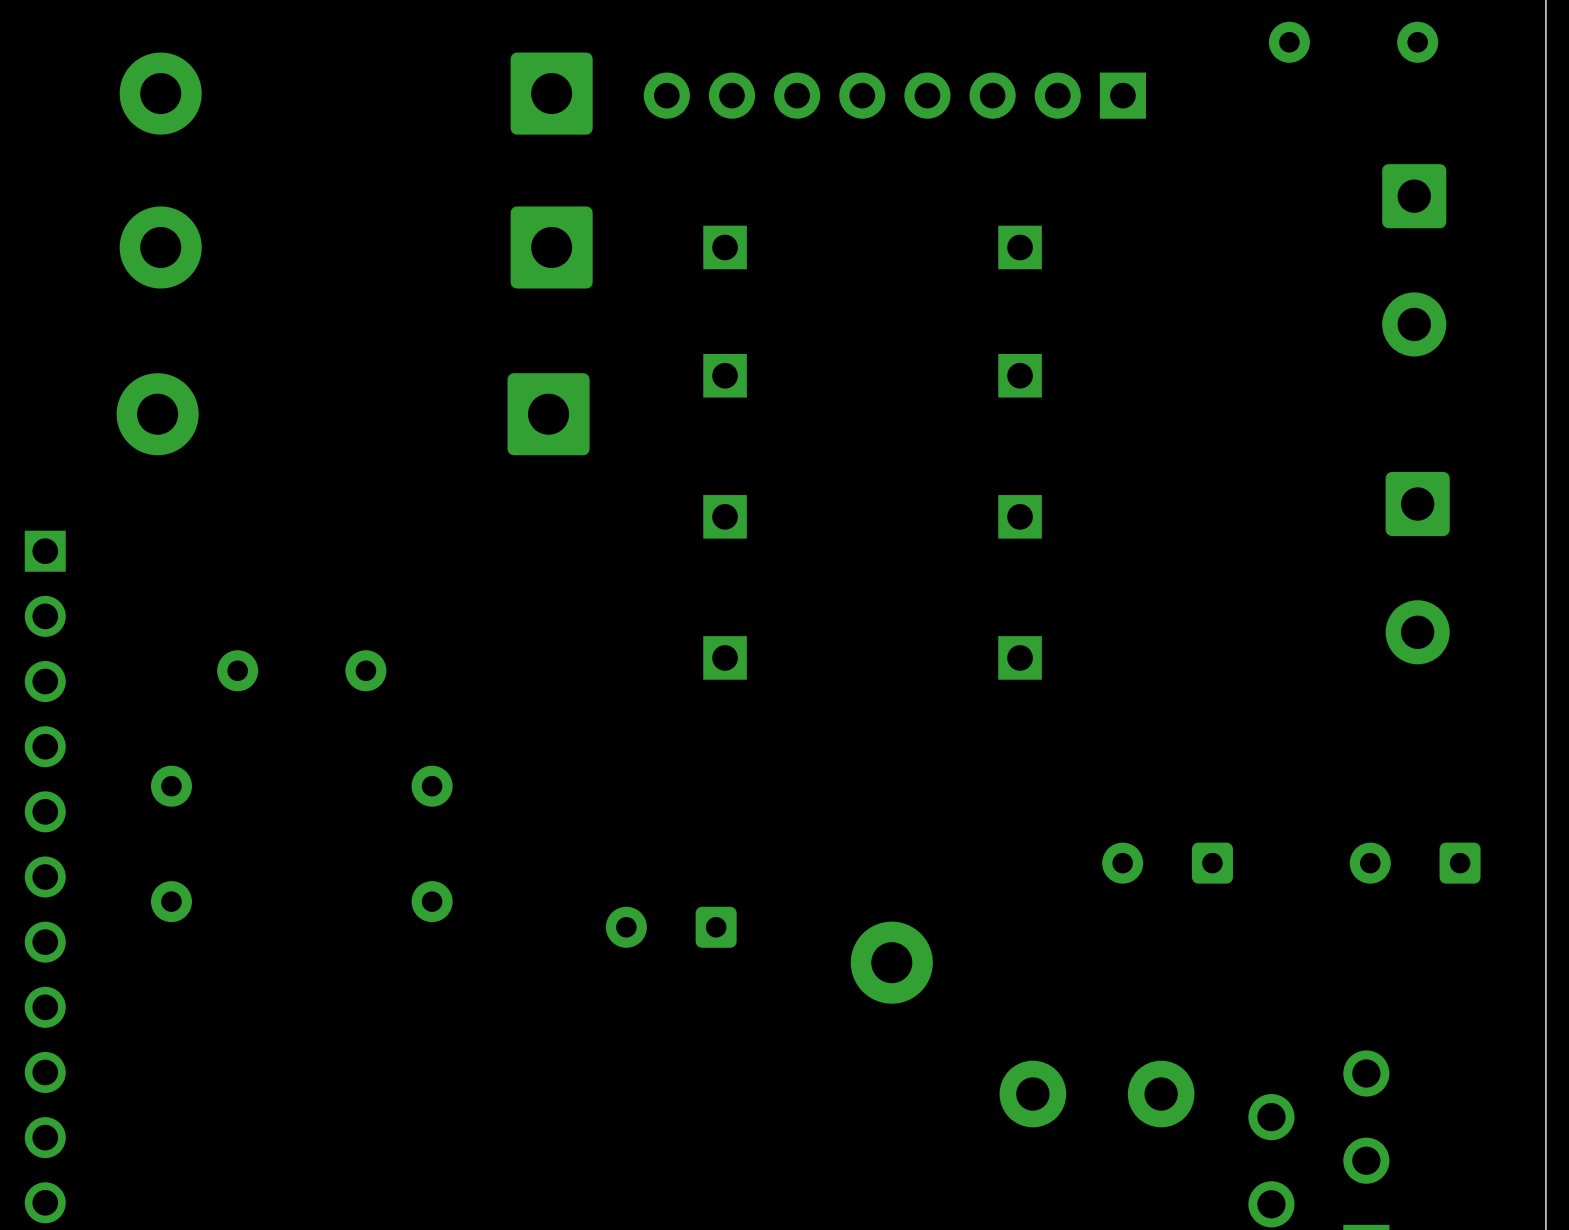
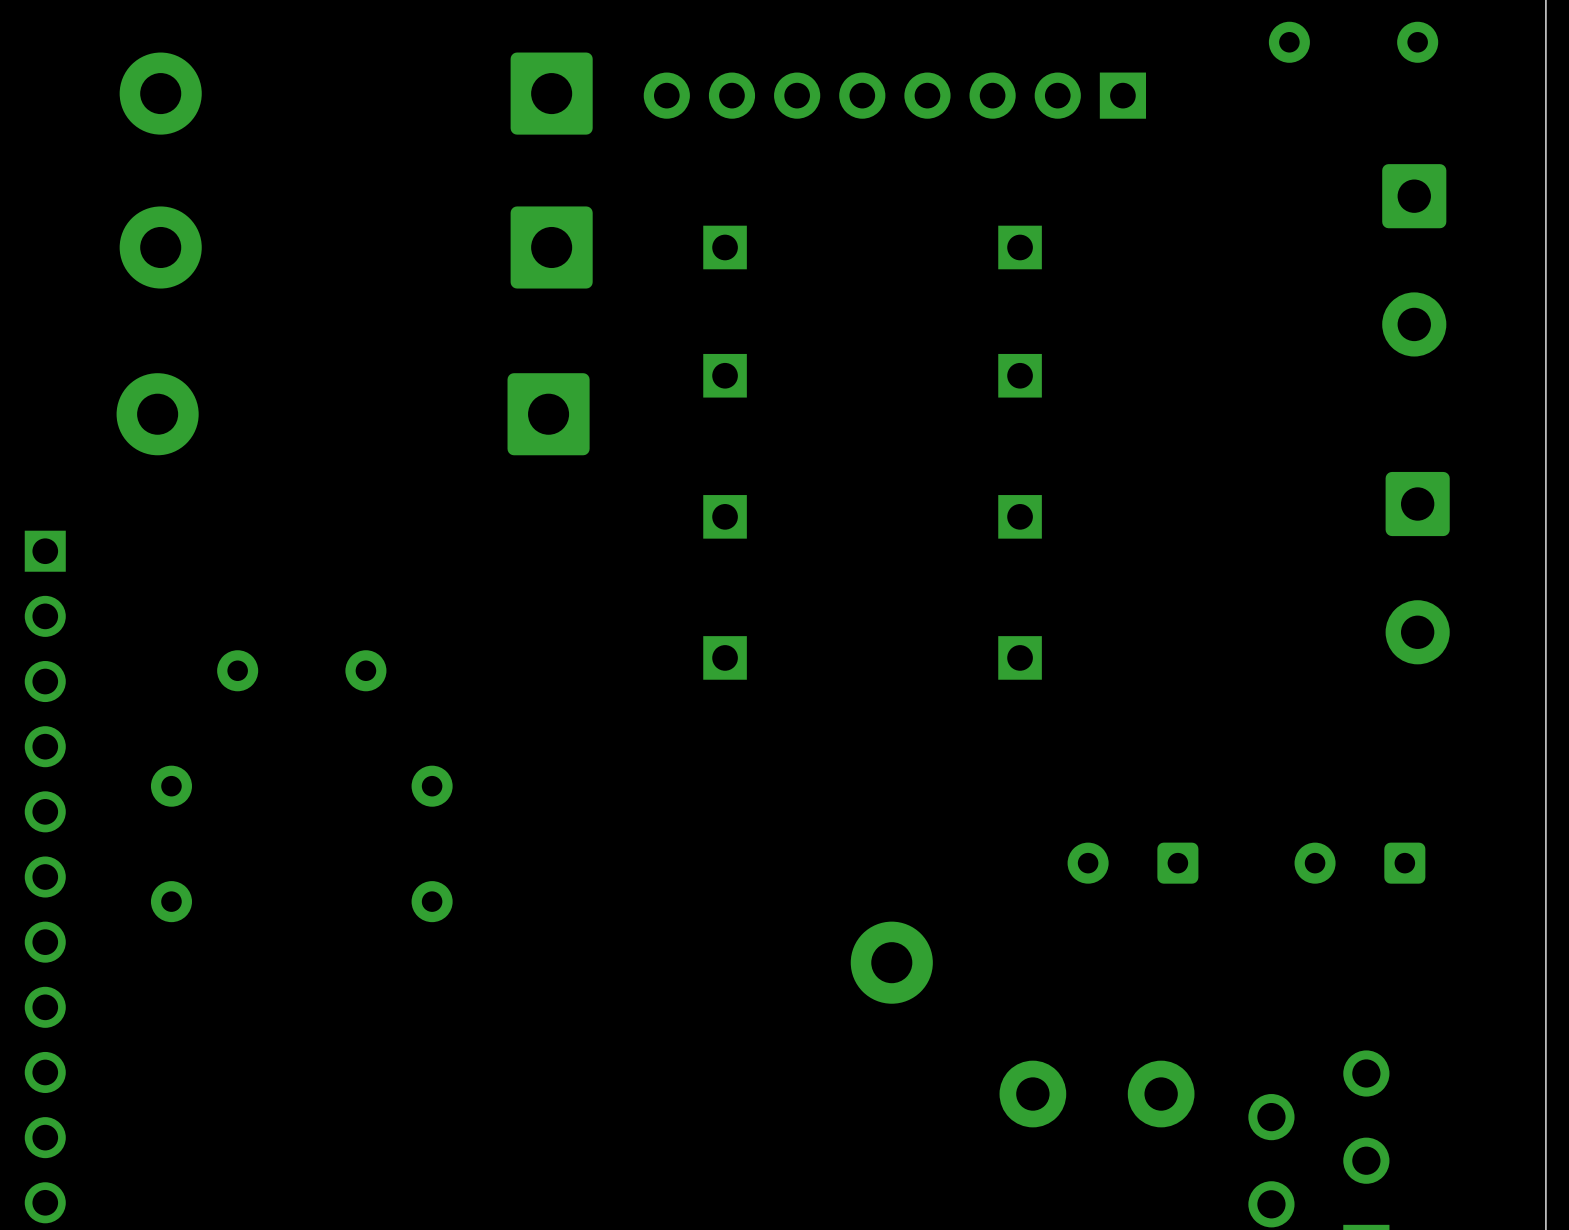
part position: (1167, 863) -> (1132, 863)
part position: (1415, 863) -> (1359, 863)
part: (671, 927) -> none

